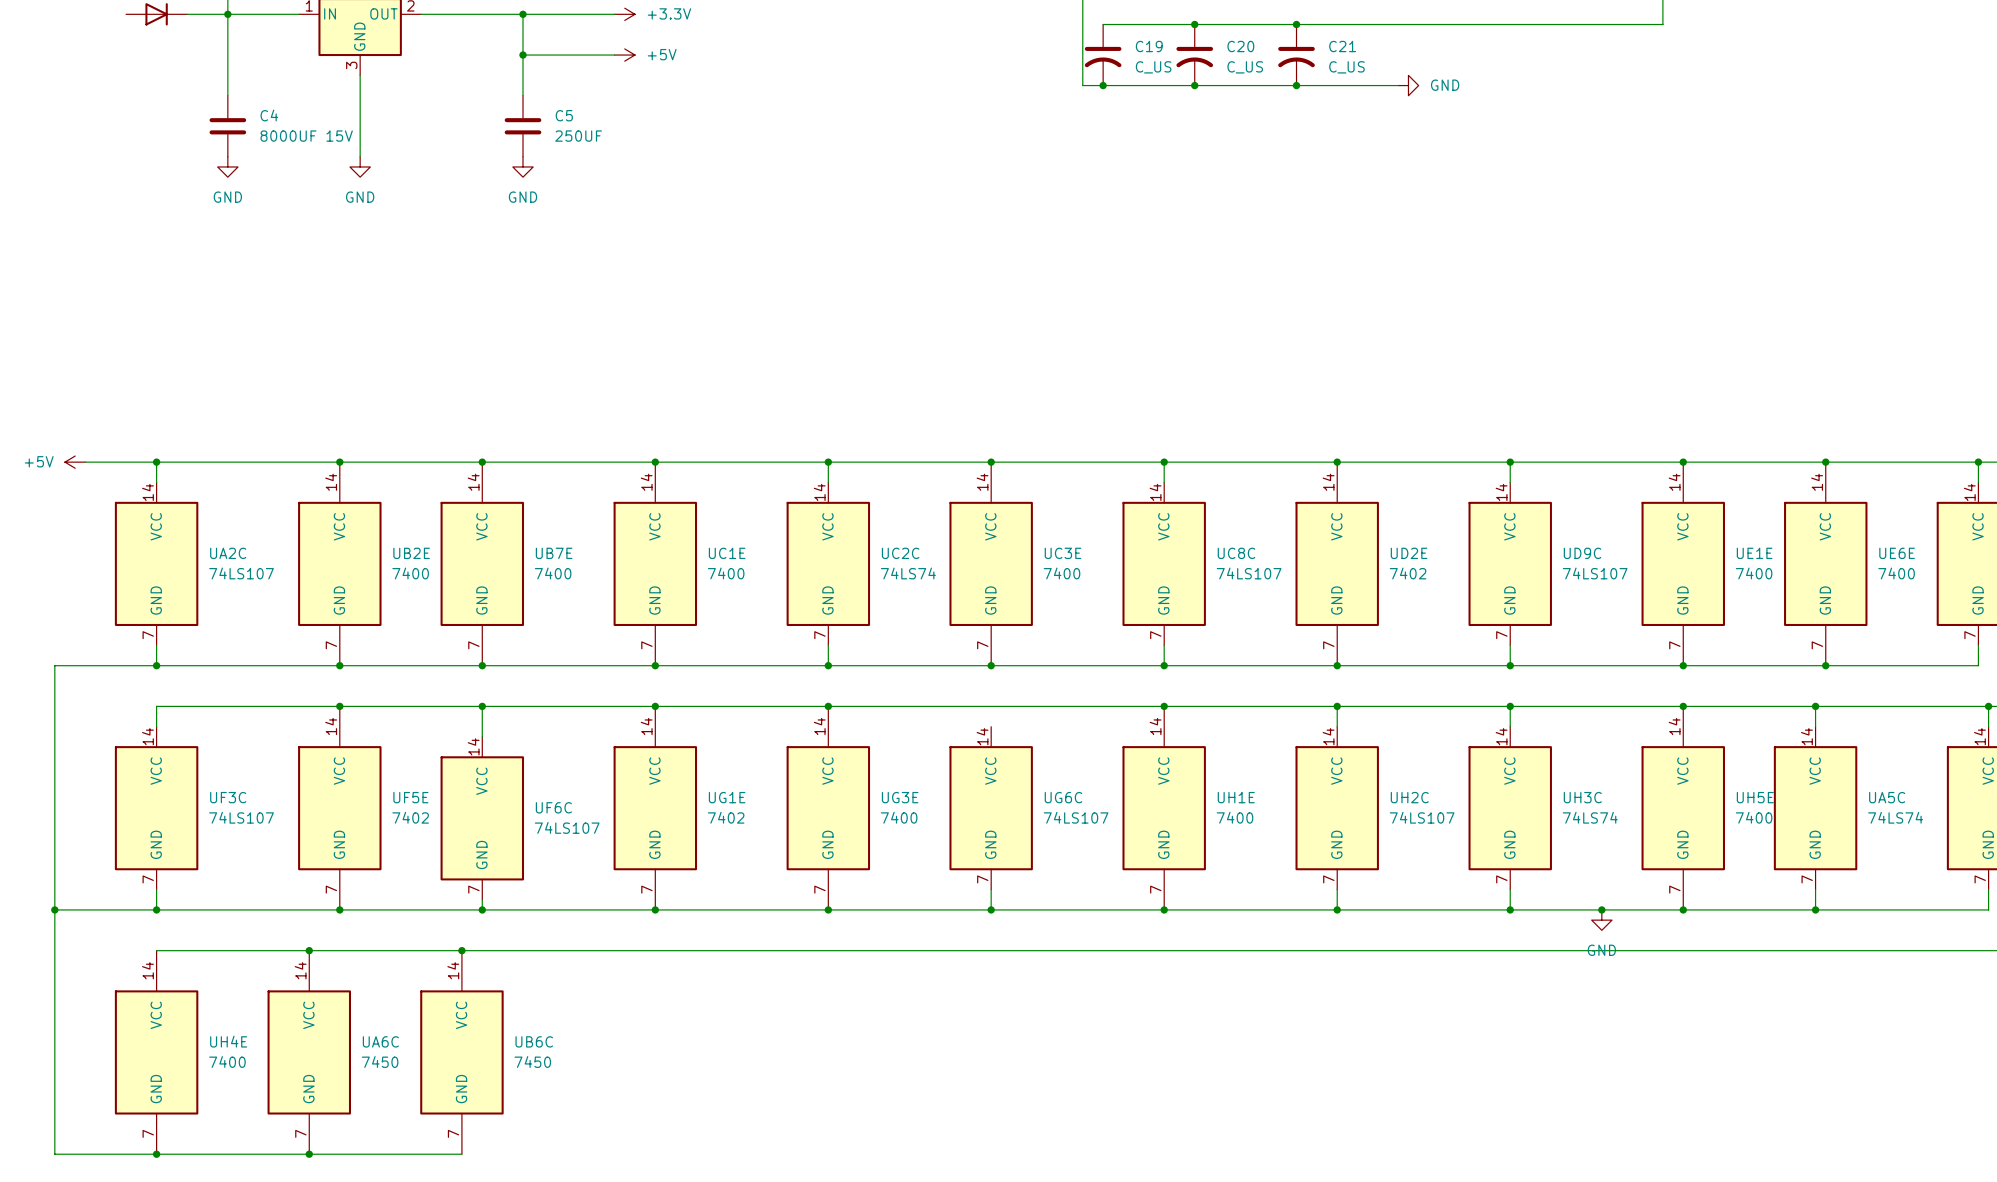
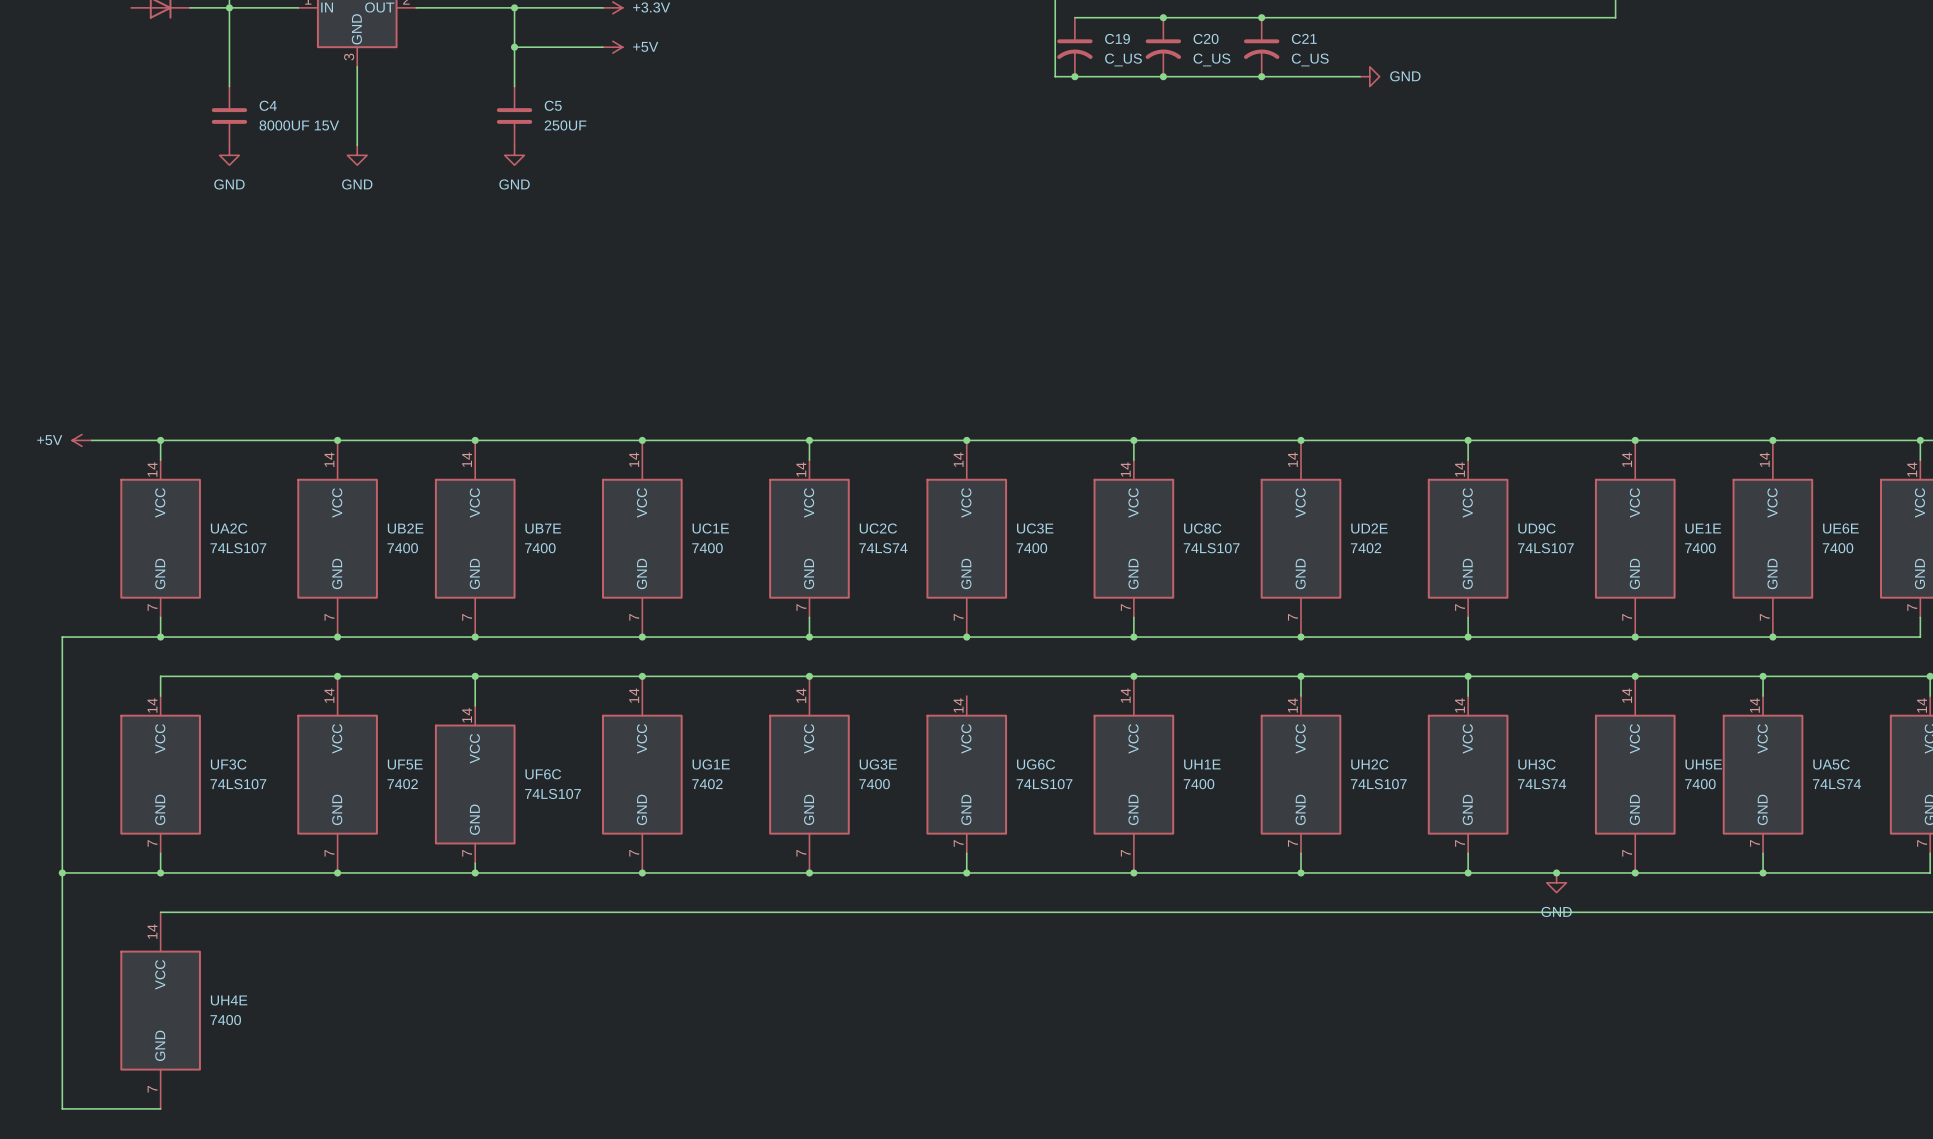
junction: (309, 950) -> none
junction: (461, 950) -> none
UA6C: 7450 (309, 1052) -> none
UB6C: 7450 (461, 1052) -> none
wire: (156, 1154) (461, 1154) -> none
junction: (156, 1154) -> none
junction: (309, 1154) -> none

